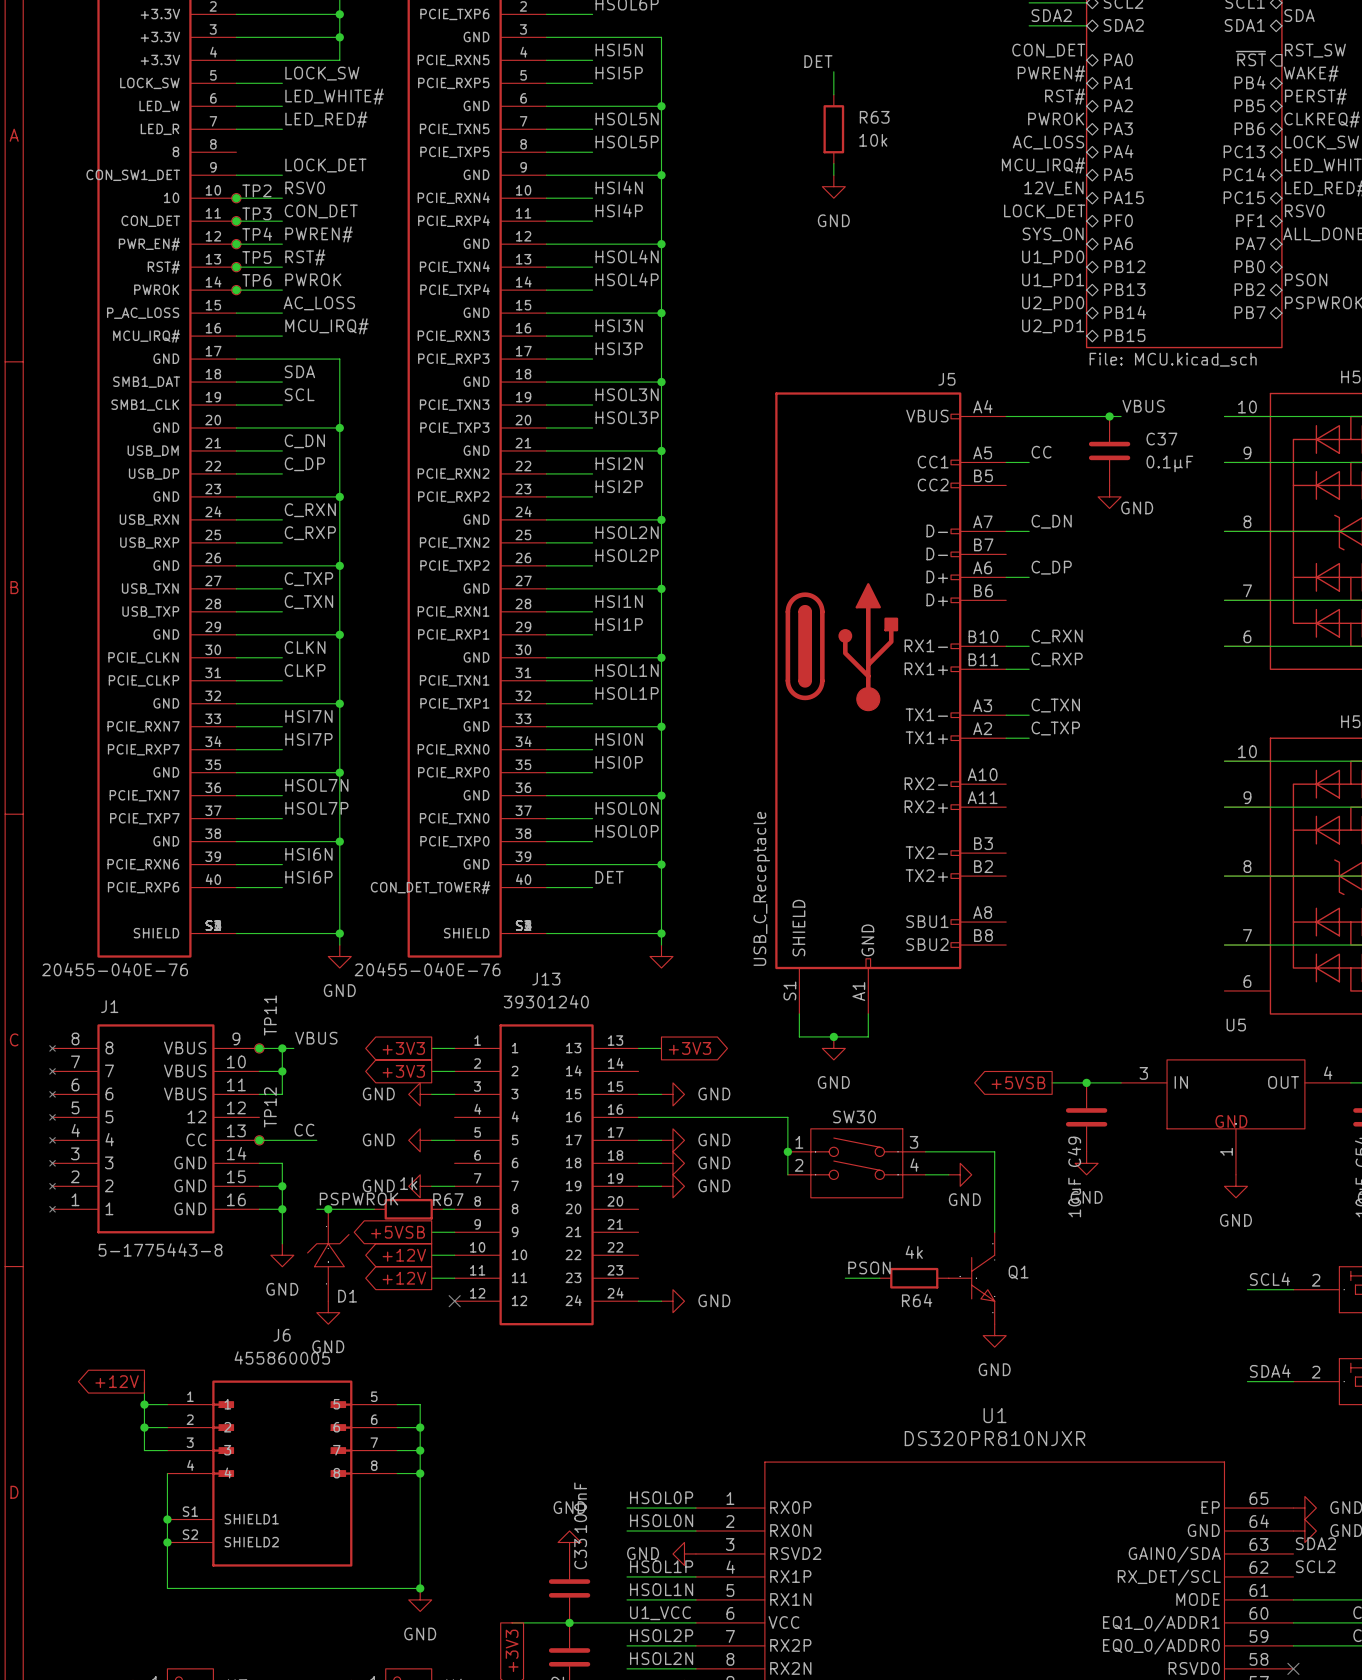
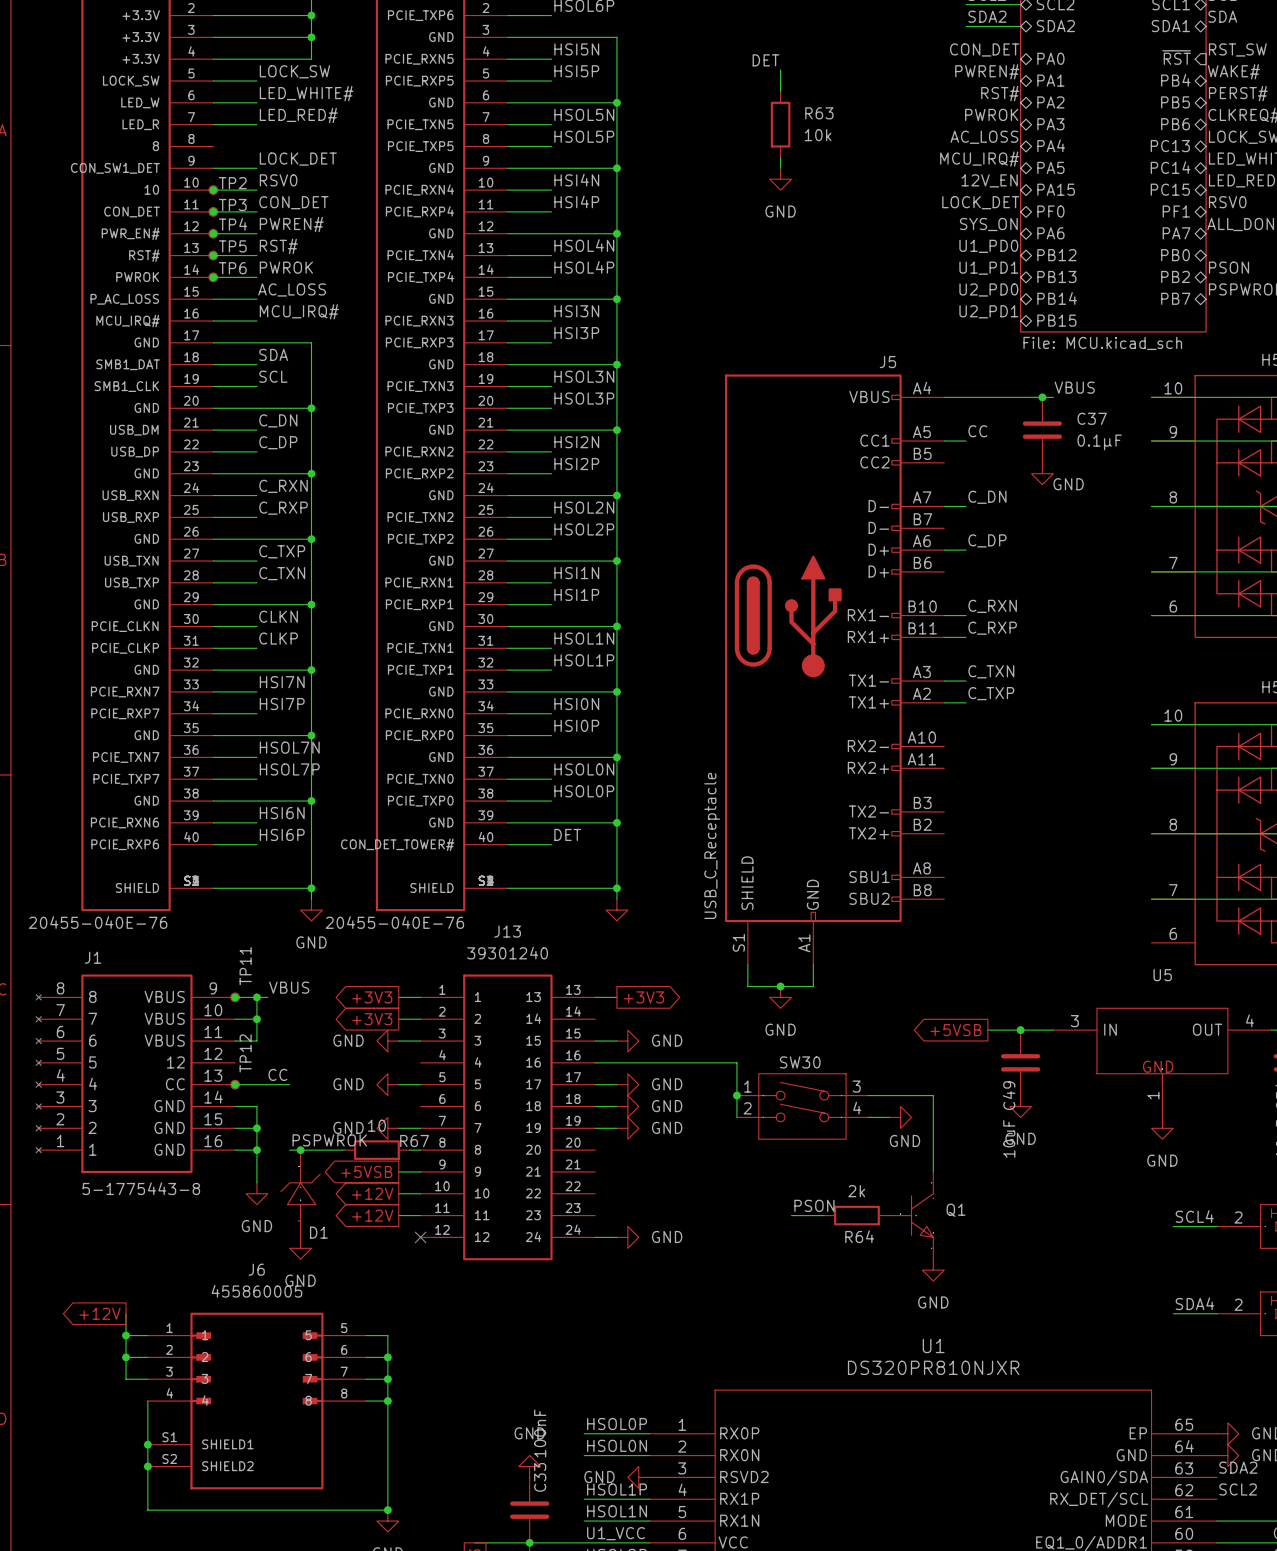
R67 value: 1k (408, 1183) -> 10 (376, 1125)
R64 value: 4k (914, 1252) -> 2k (856, 1191)

